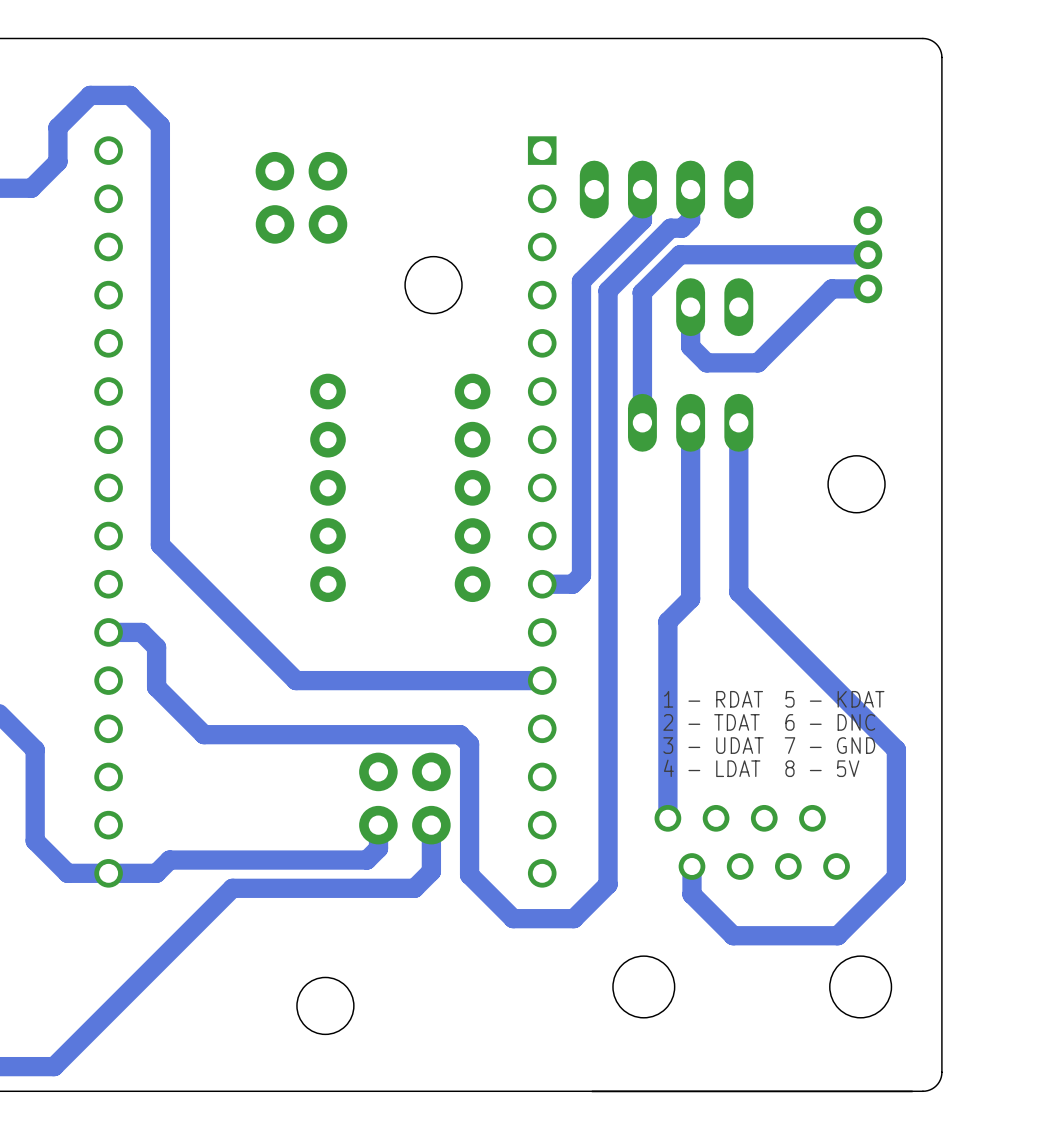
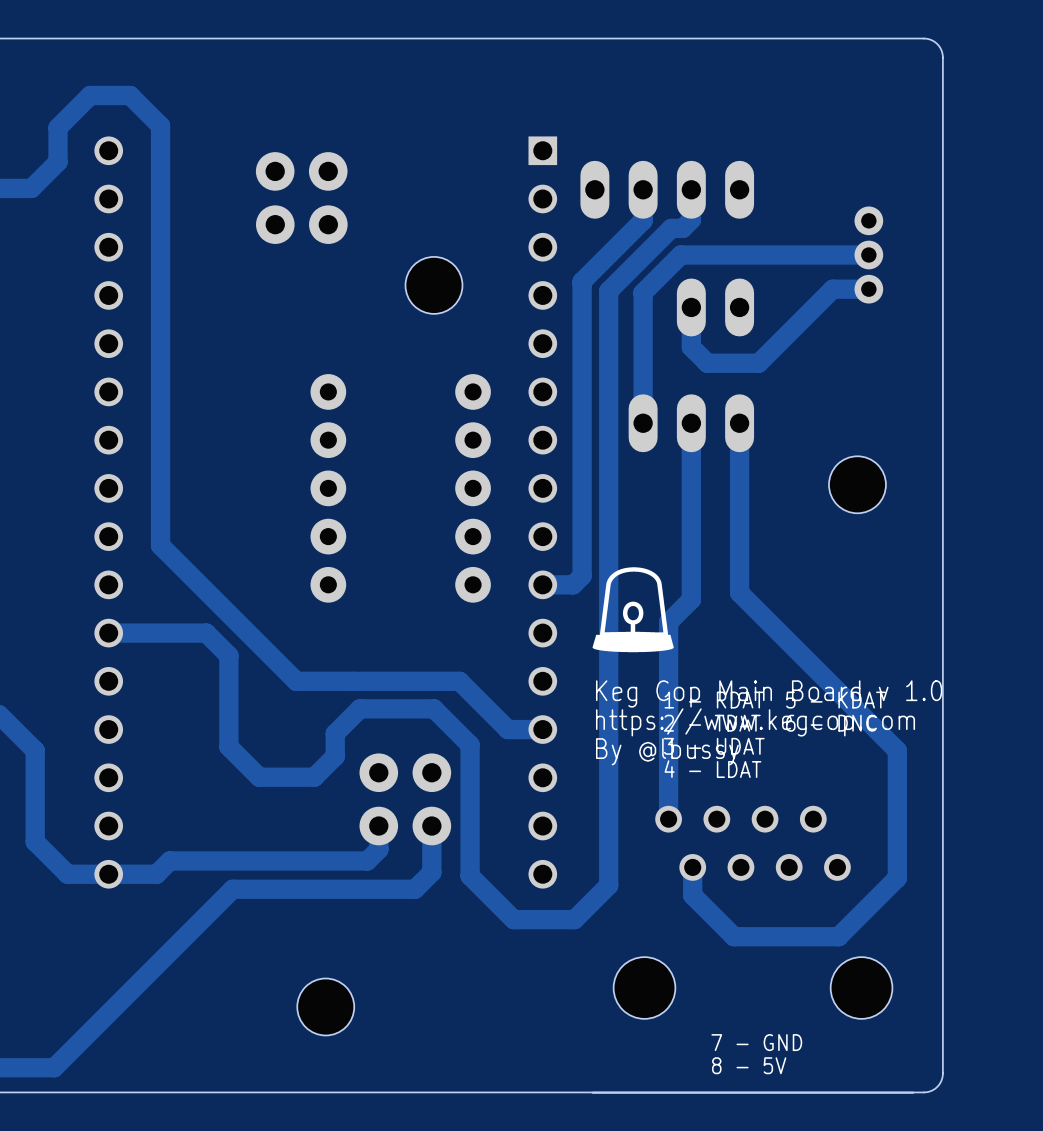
drawing: none -> [592, 567, 674, 653]
track: (141, 632) (156, 647) (156, 687) (204, 734) (460, 734) -> (141, 633) (206, 633) (228, 655) (228, 746) (259, 777) (314, 777) (335, 756) (335, 733) (359, 708) (433, 708) (460, 735)
track: (542, 680) (459, 680) -> (542, 729) (507, 729) (459, 681)
text: none -> Keg Cop Main Board v 1.0 (769, 693)
text: none -> https://www.kegcop.com (755, 722)
text position: 7 - GND (829, 745) -> 7 - GND (756, 1042)
text: none -> By @lbussy (667, 751)
text position: 8 - 5V (822, 768) -> 8 - 5V (749, 1065)

